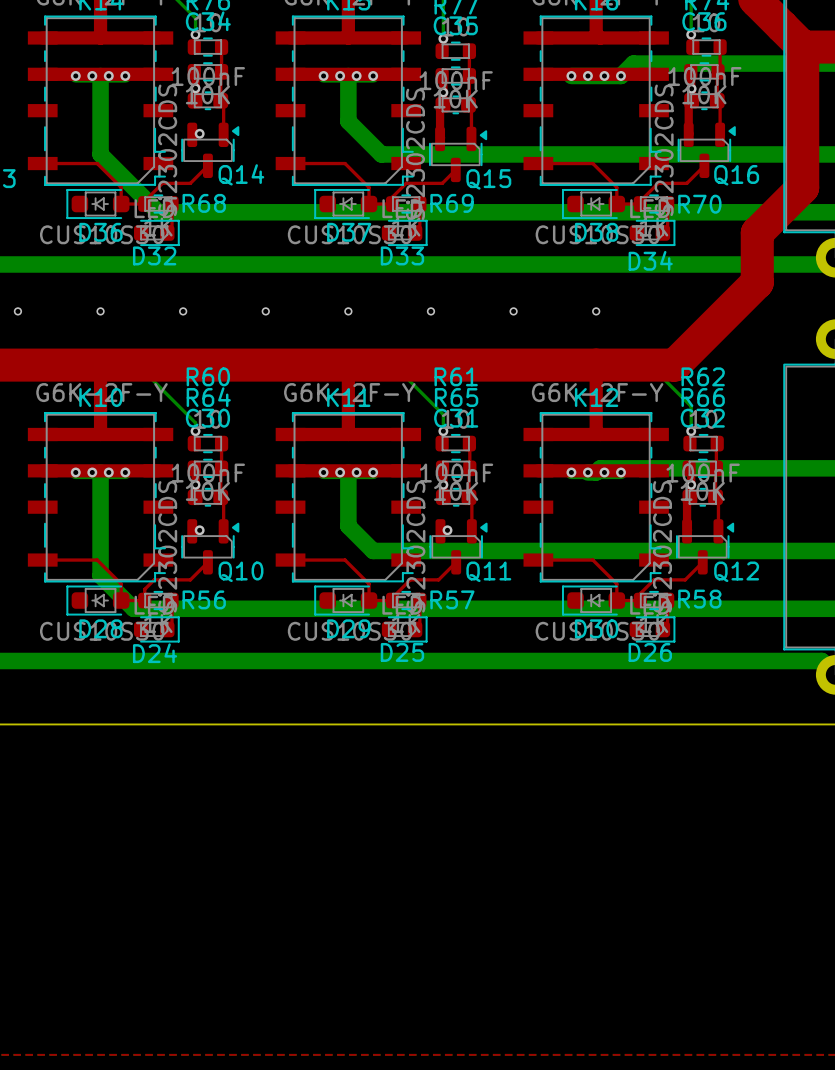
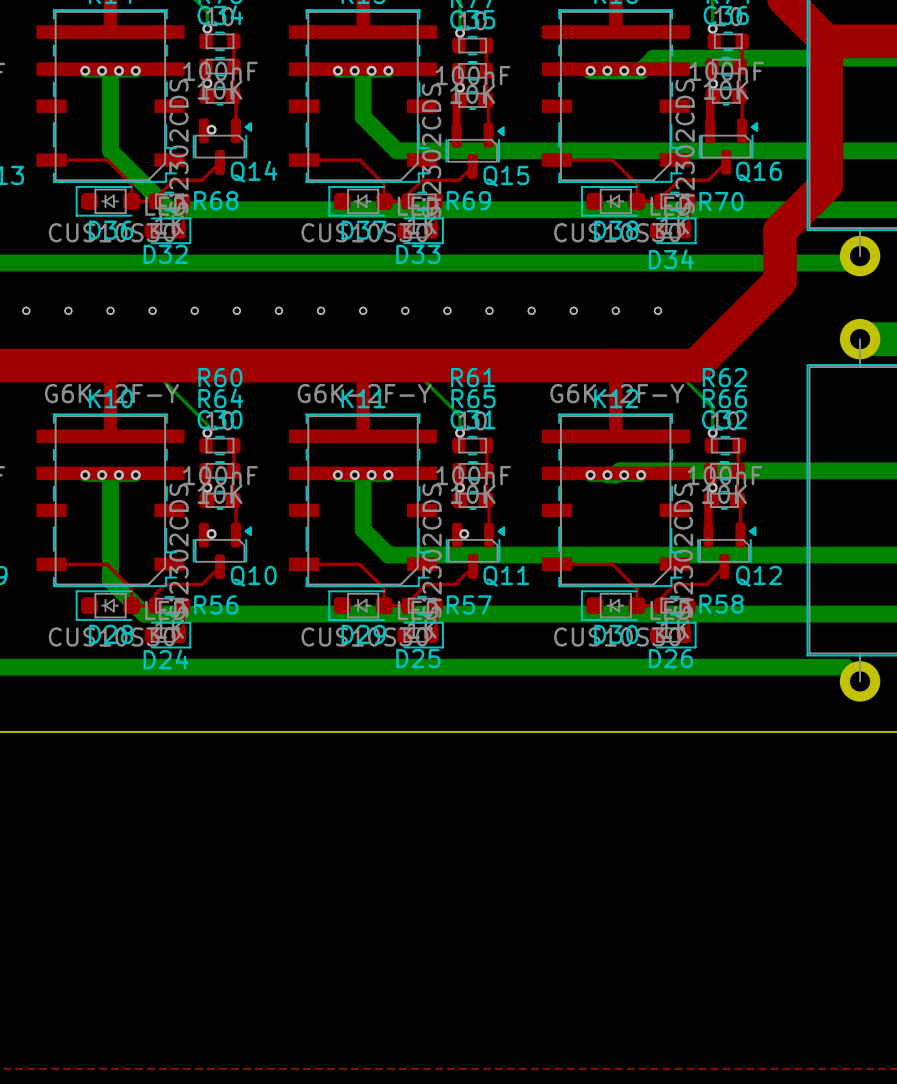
via: none -> (68, 310)
via: none -> (152, 310)
via: none -> (236, 310)
via: none -> (321, 310)
via: none -> (405, 310)
via: none -> (489, 310)
via: none -> (573, 310)
via: none -> (657, 310)

